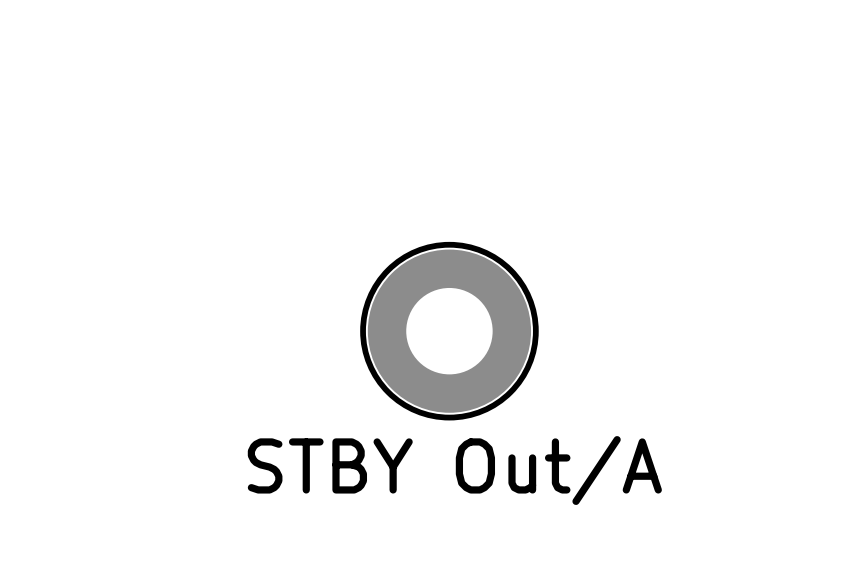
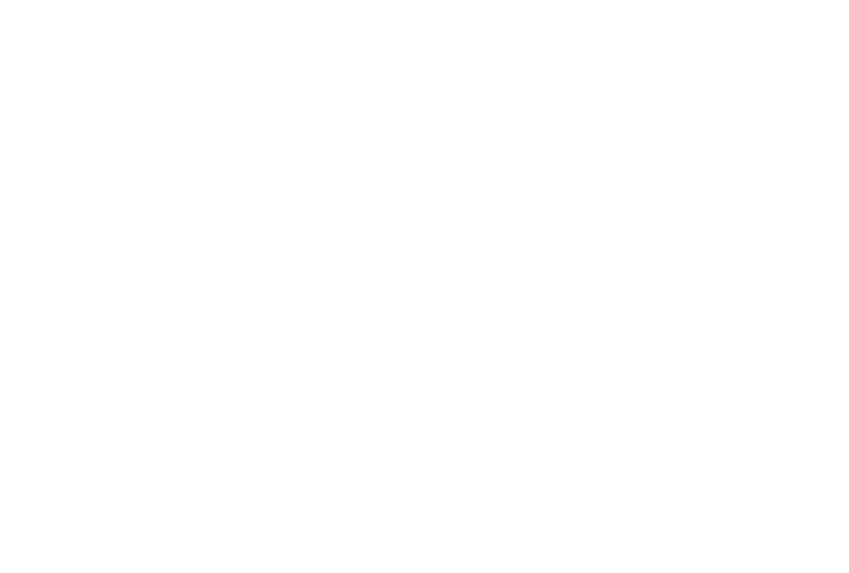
part: STBY Out/A (449, 331) -> none

